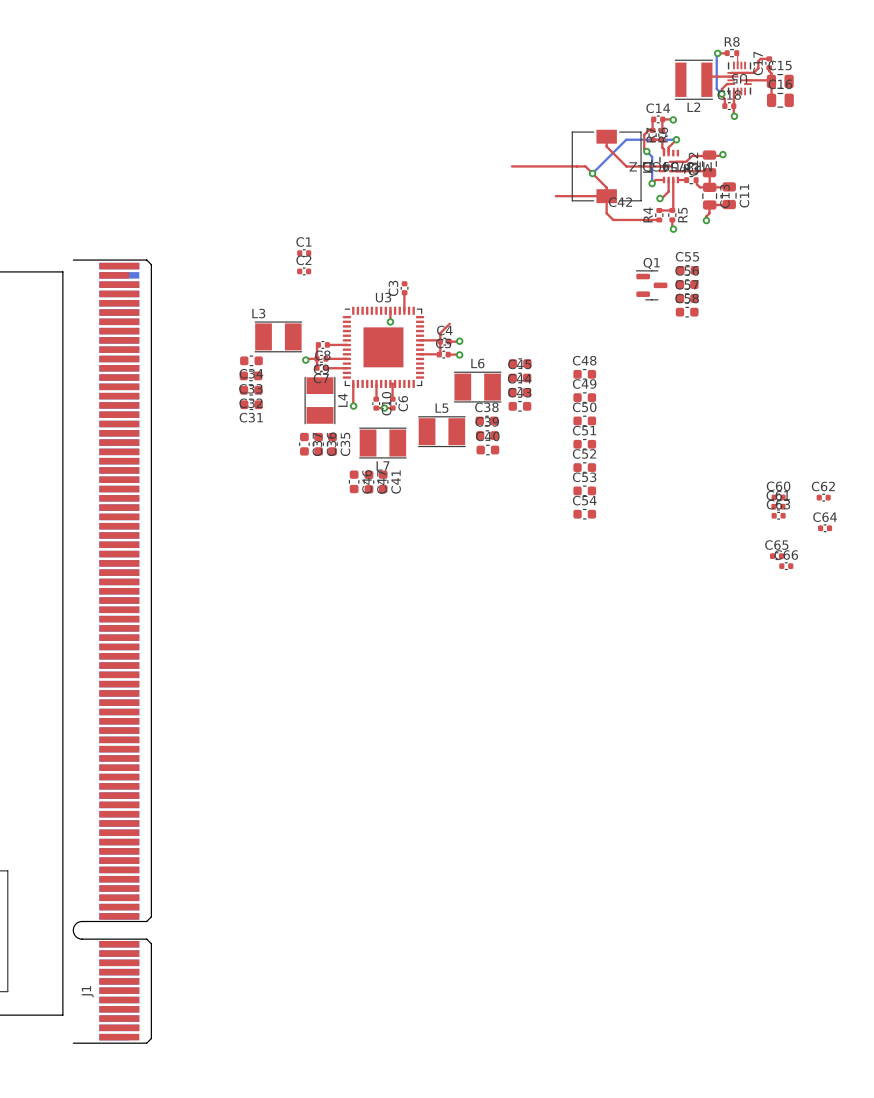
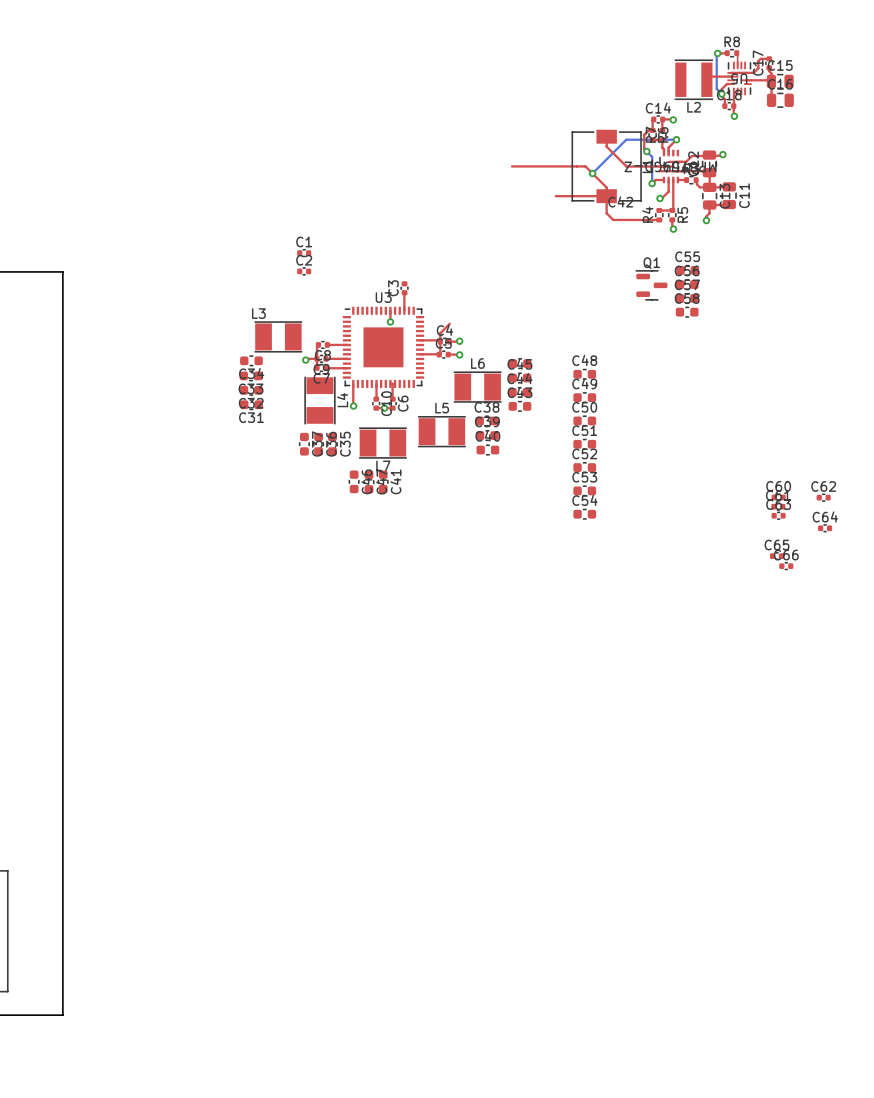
J1: (112, 651) -> none

